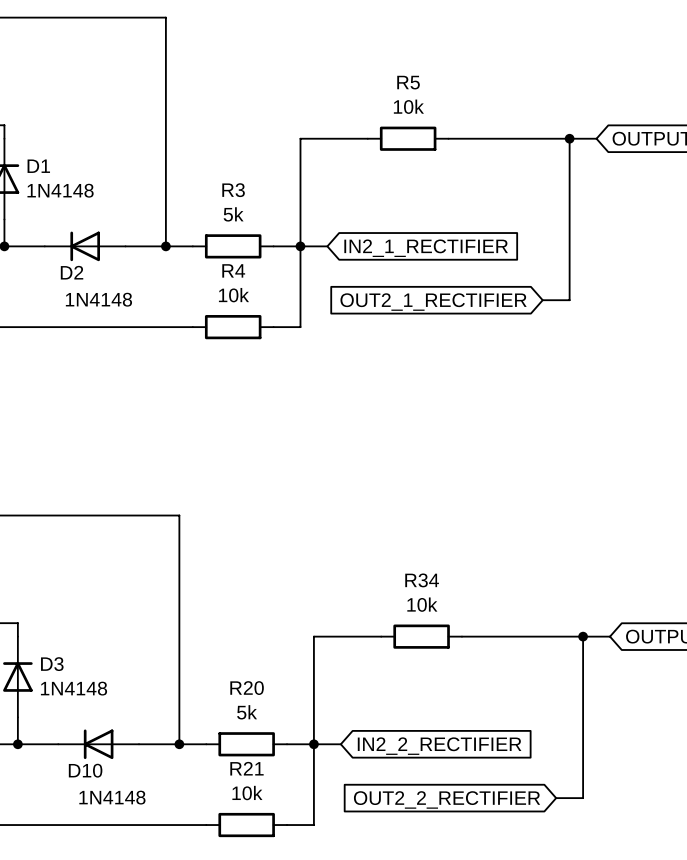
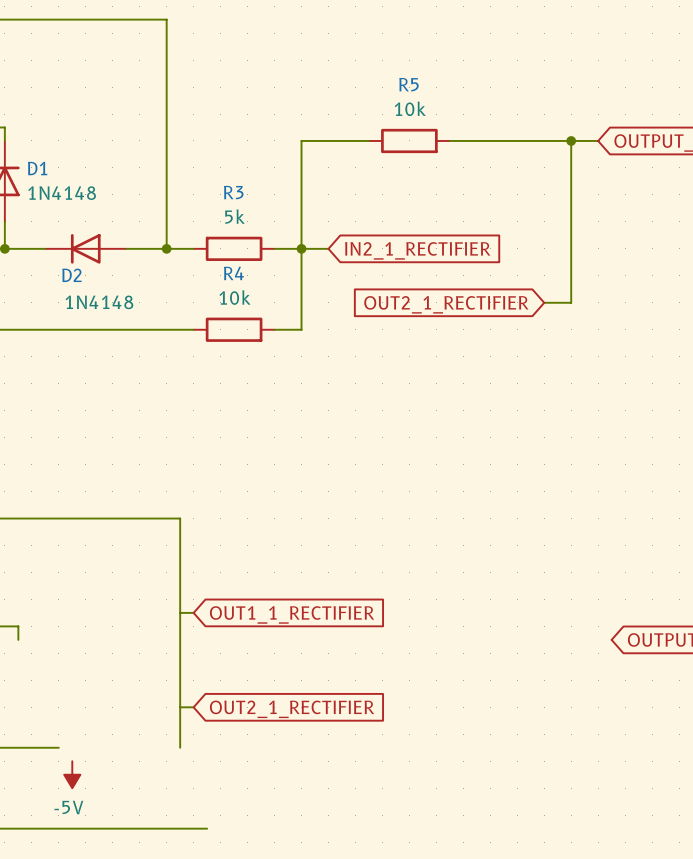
wire: none -> (180, 612) (193, 612)
global label: none -> OUT1_1_RECTIFIER (292, 614)
wire: (381, 636) (313, 636) (313, 825) (287, 825) -> none
R34: 10k (421, 636) -> none
wire: (461, 636) (609, 636) -> none
wire: (583, 636) (583, 798) (556, 798) -> none
junction: (583, 636) -> none
D3: 1N4148 (17, 677) -> none
wire: none -> (180, 707) (193, 707)
global label: none -> OUT2_1_RECTIFIER (292, 709)
wire: (17, 717) (17, 744) -> none
junction: (17, 744) -> none
D10: 1N4148 (98, 744) -> none
wire: (139, 744) (206, 744) -> none
junction: (179, 744) -> none
R20: 5k (246, 744) -> none
wire: (287, 744) (340, 744) -> none
junction: (313, 744) -> none
global label: IN2_2_RECTIFIER (439, 746) -> none
power symbol: none -> -5V (72, 774)
global label: OUT2_2_RECTIFIER (447, 799) -> none
R21: 10k (246, 825) -> none

